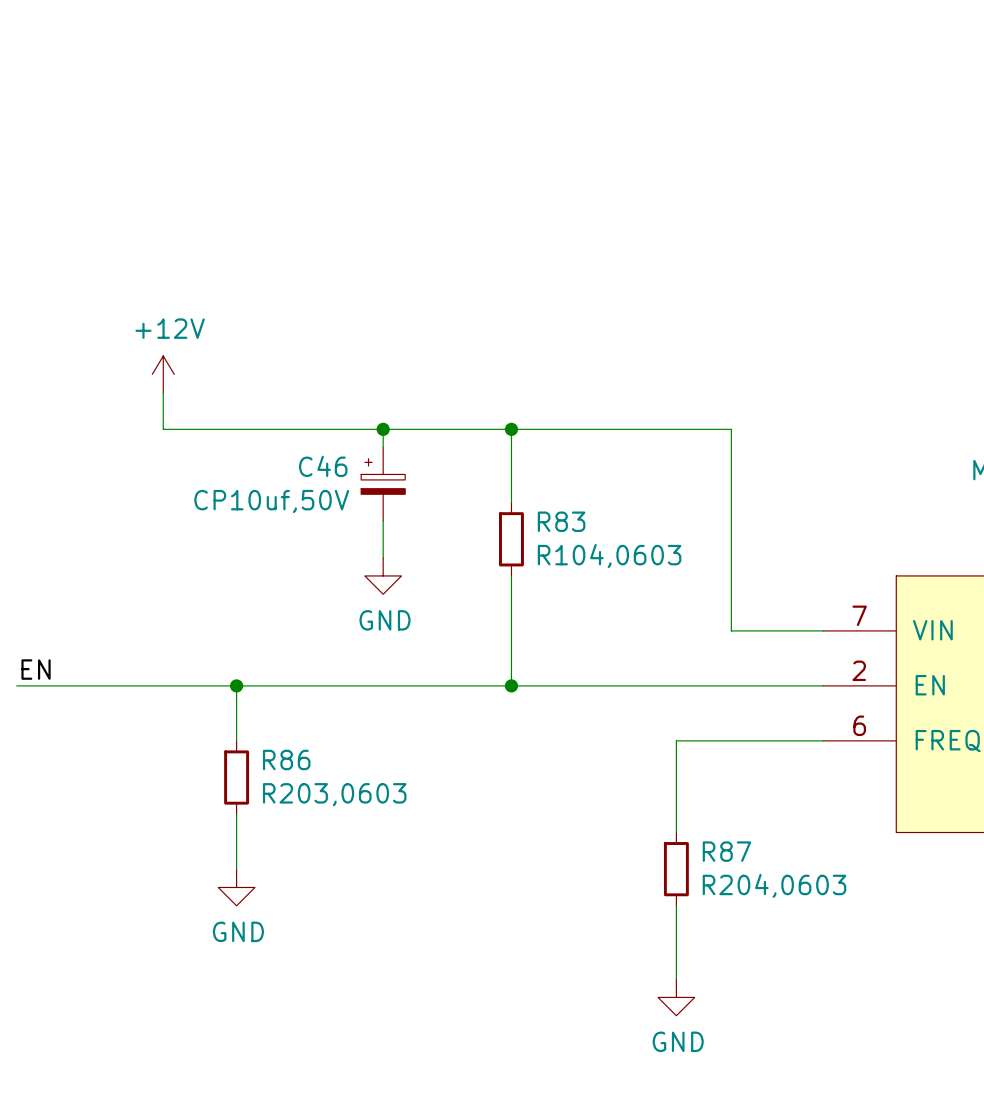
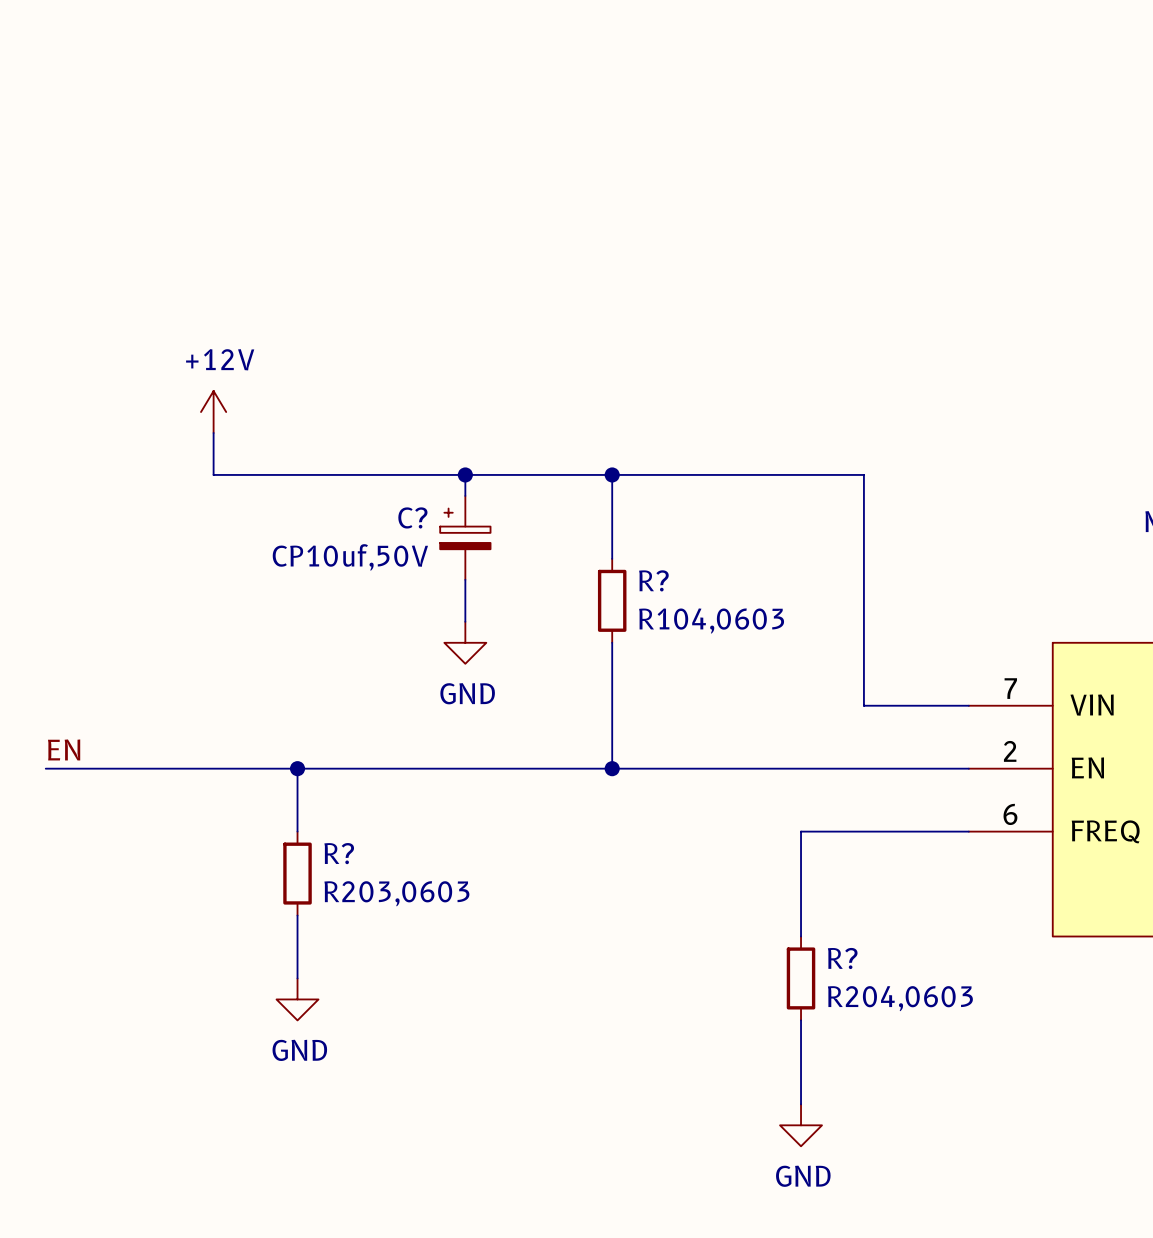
C46 name: C46 (323, 466) -> C? (412, 517)
R83 name: R83 (561, 521) -> R? (653, 580)
R86 name: R86 (286, 759) -> R? (339, 853)
R87 name: R87 (726, 851) -> R? (842, 958)

